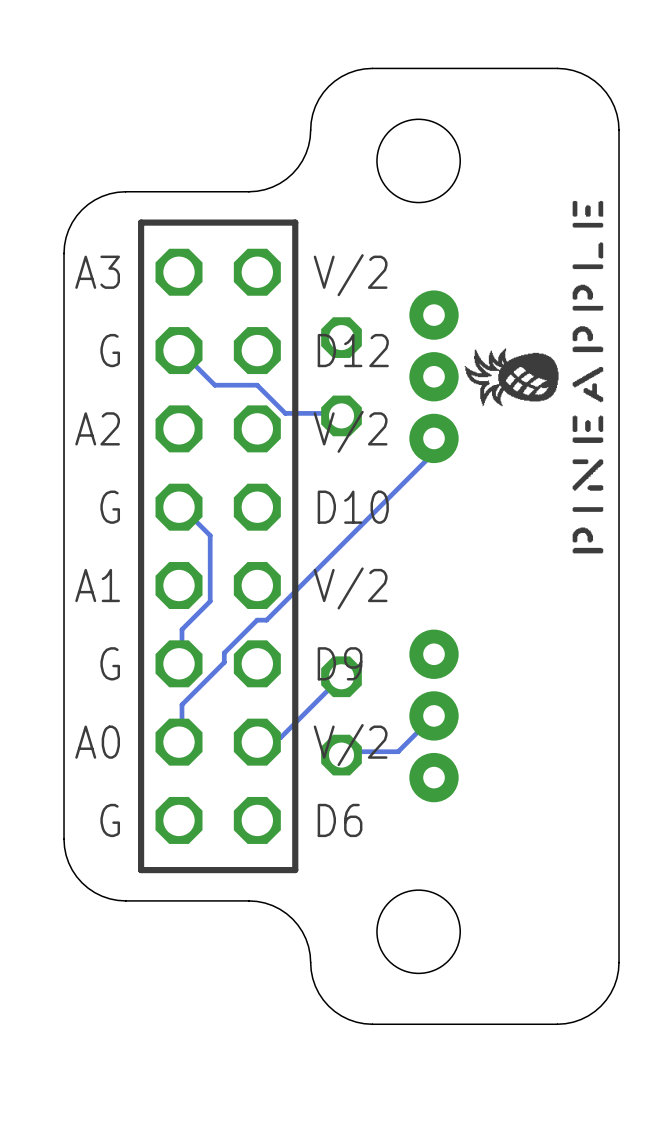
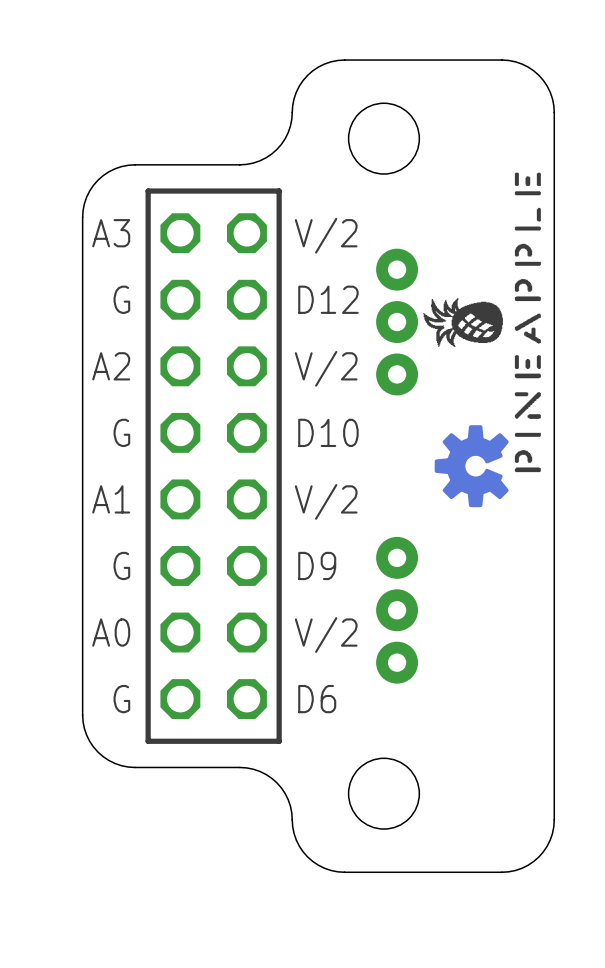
track: (179, 350) (214, 385) (257, 385) (285, 413) (337, 413) (341, 415) -> none
part: (341, 376) -> none
track: (434, 438) (431, 441) (431, 455) (266, 620) (257, 620) (224, 653) (224, 662) (182, 704) (182, 737) (179, 742) -> none
drawing: none -> [434, 425, 509, 508]
track: (179, 507) (182, 507) (210, 535) (210, 601) (182, 629) (182, 662) (179, 663) -> none
track: (341, 676) (280, 737) (261, 737) (257, 742) -> none
part: (341, 715) -> none
track: (434, 715) (398, 751) (341, 751) (341, 755) -> none

